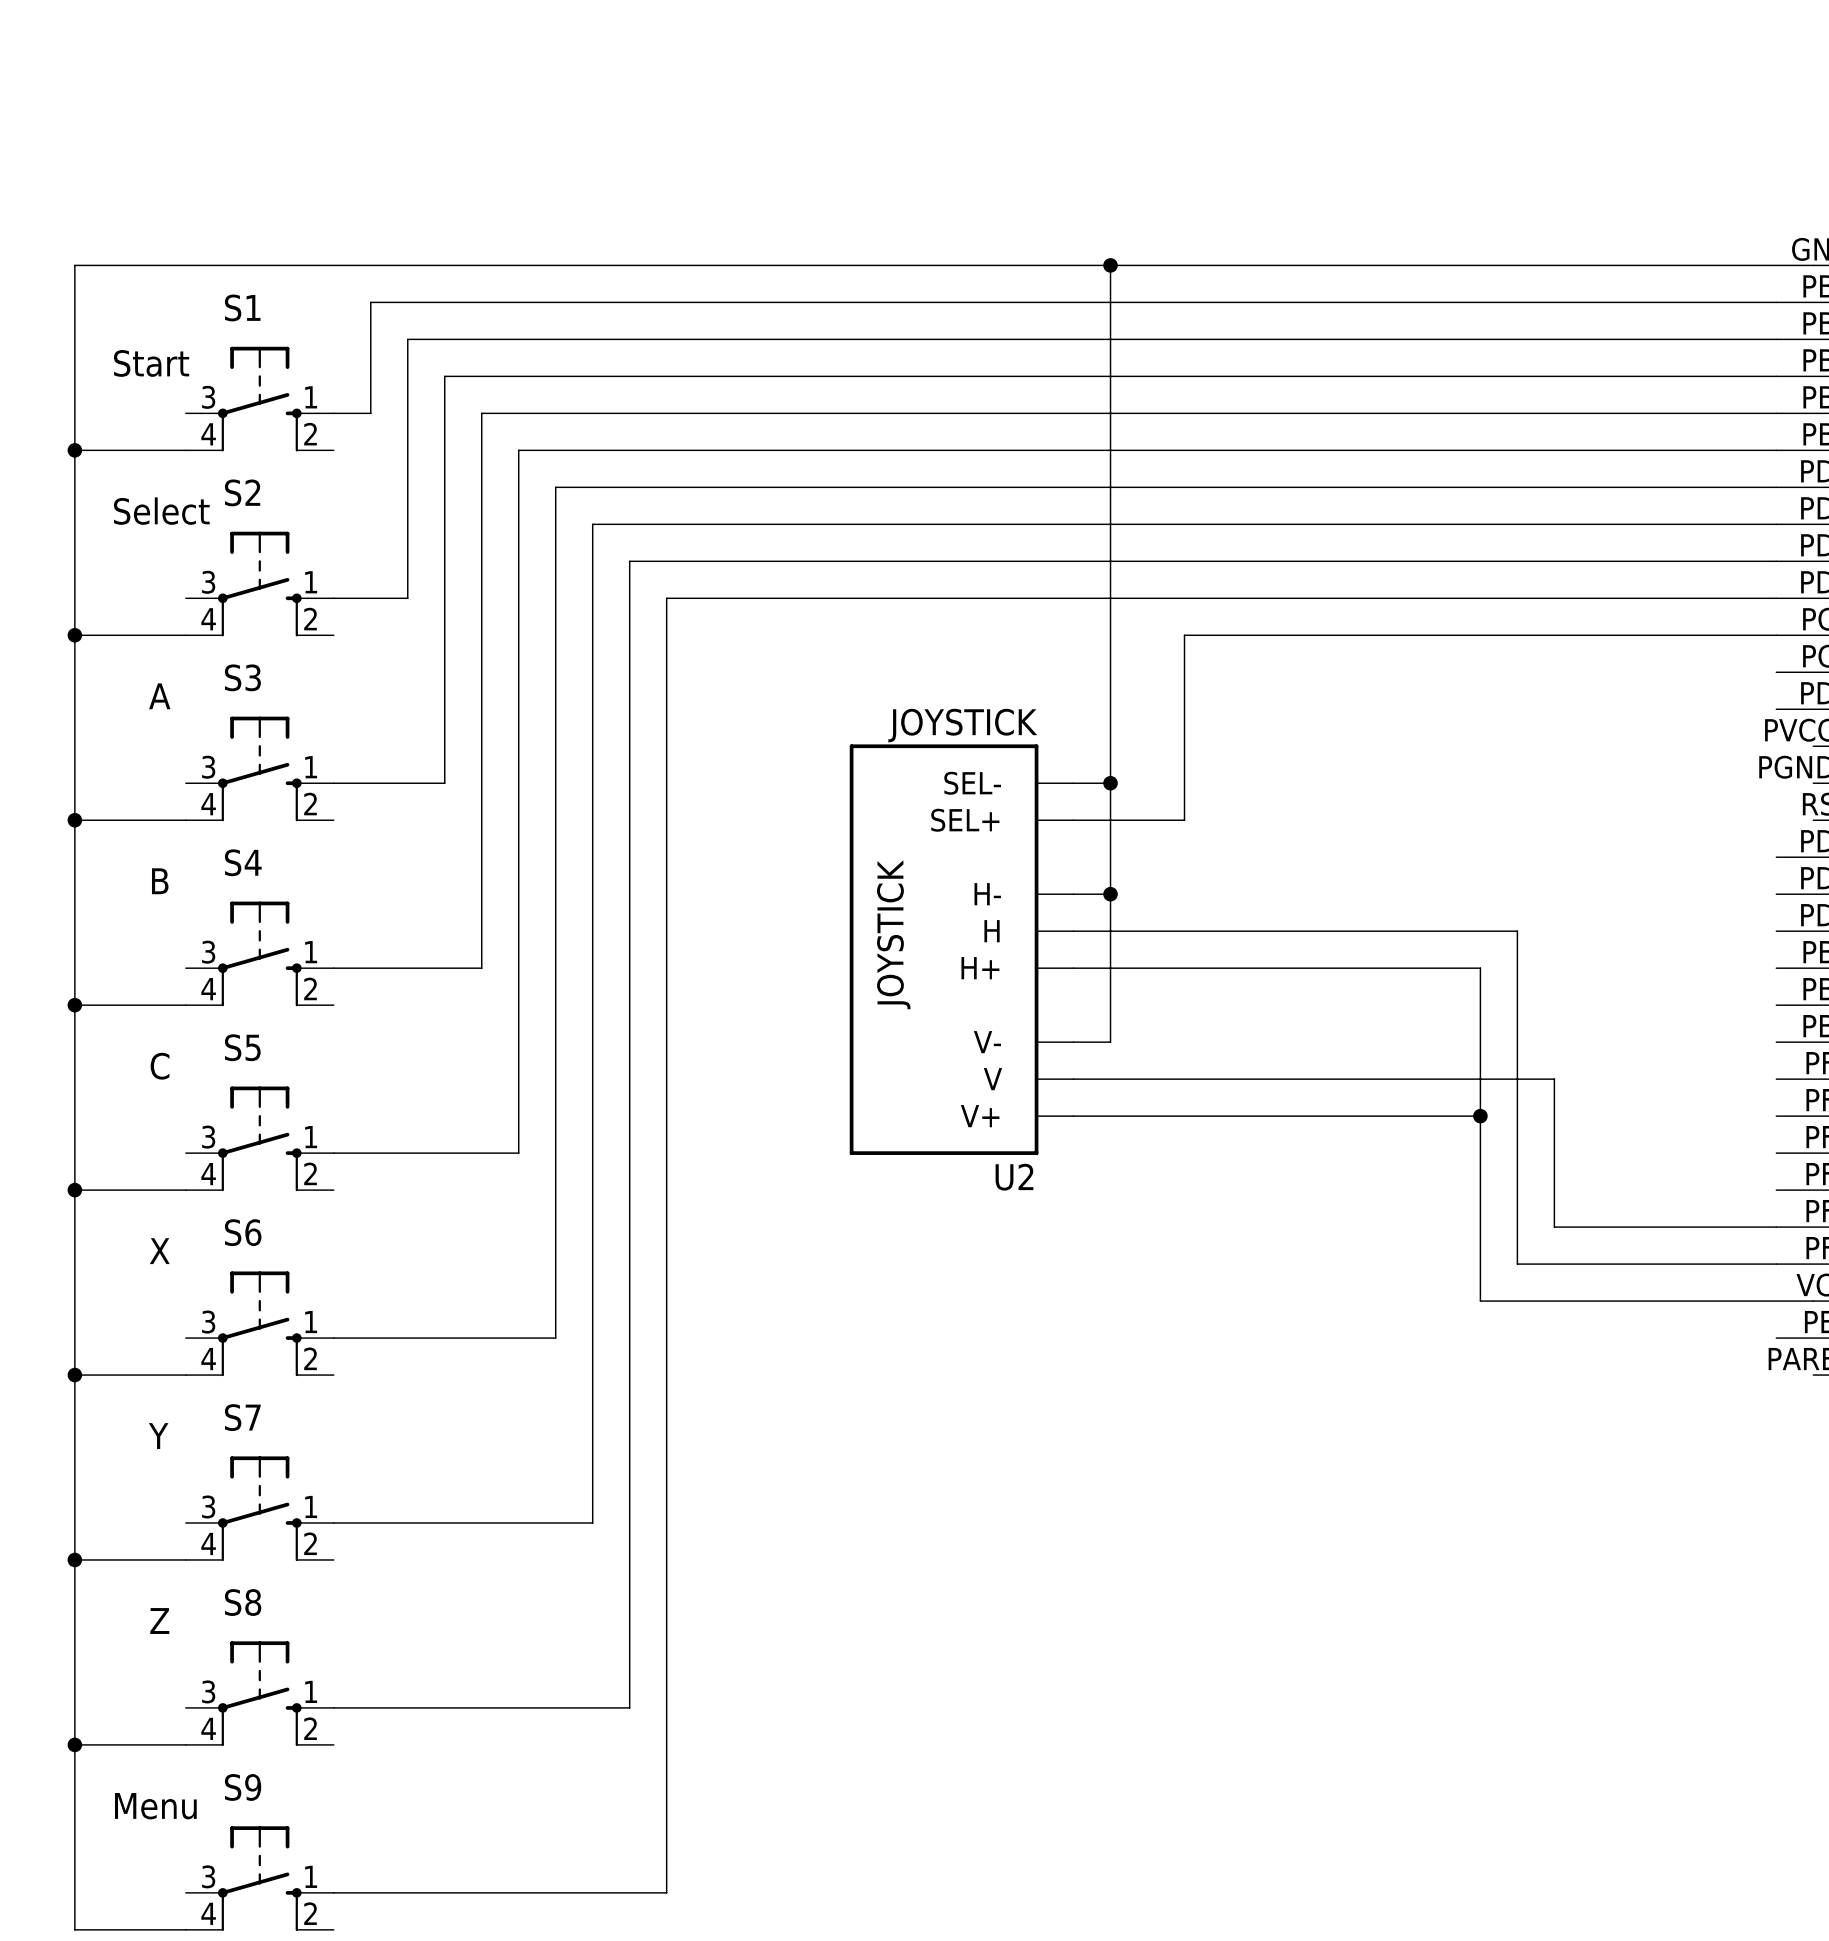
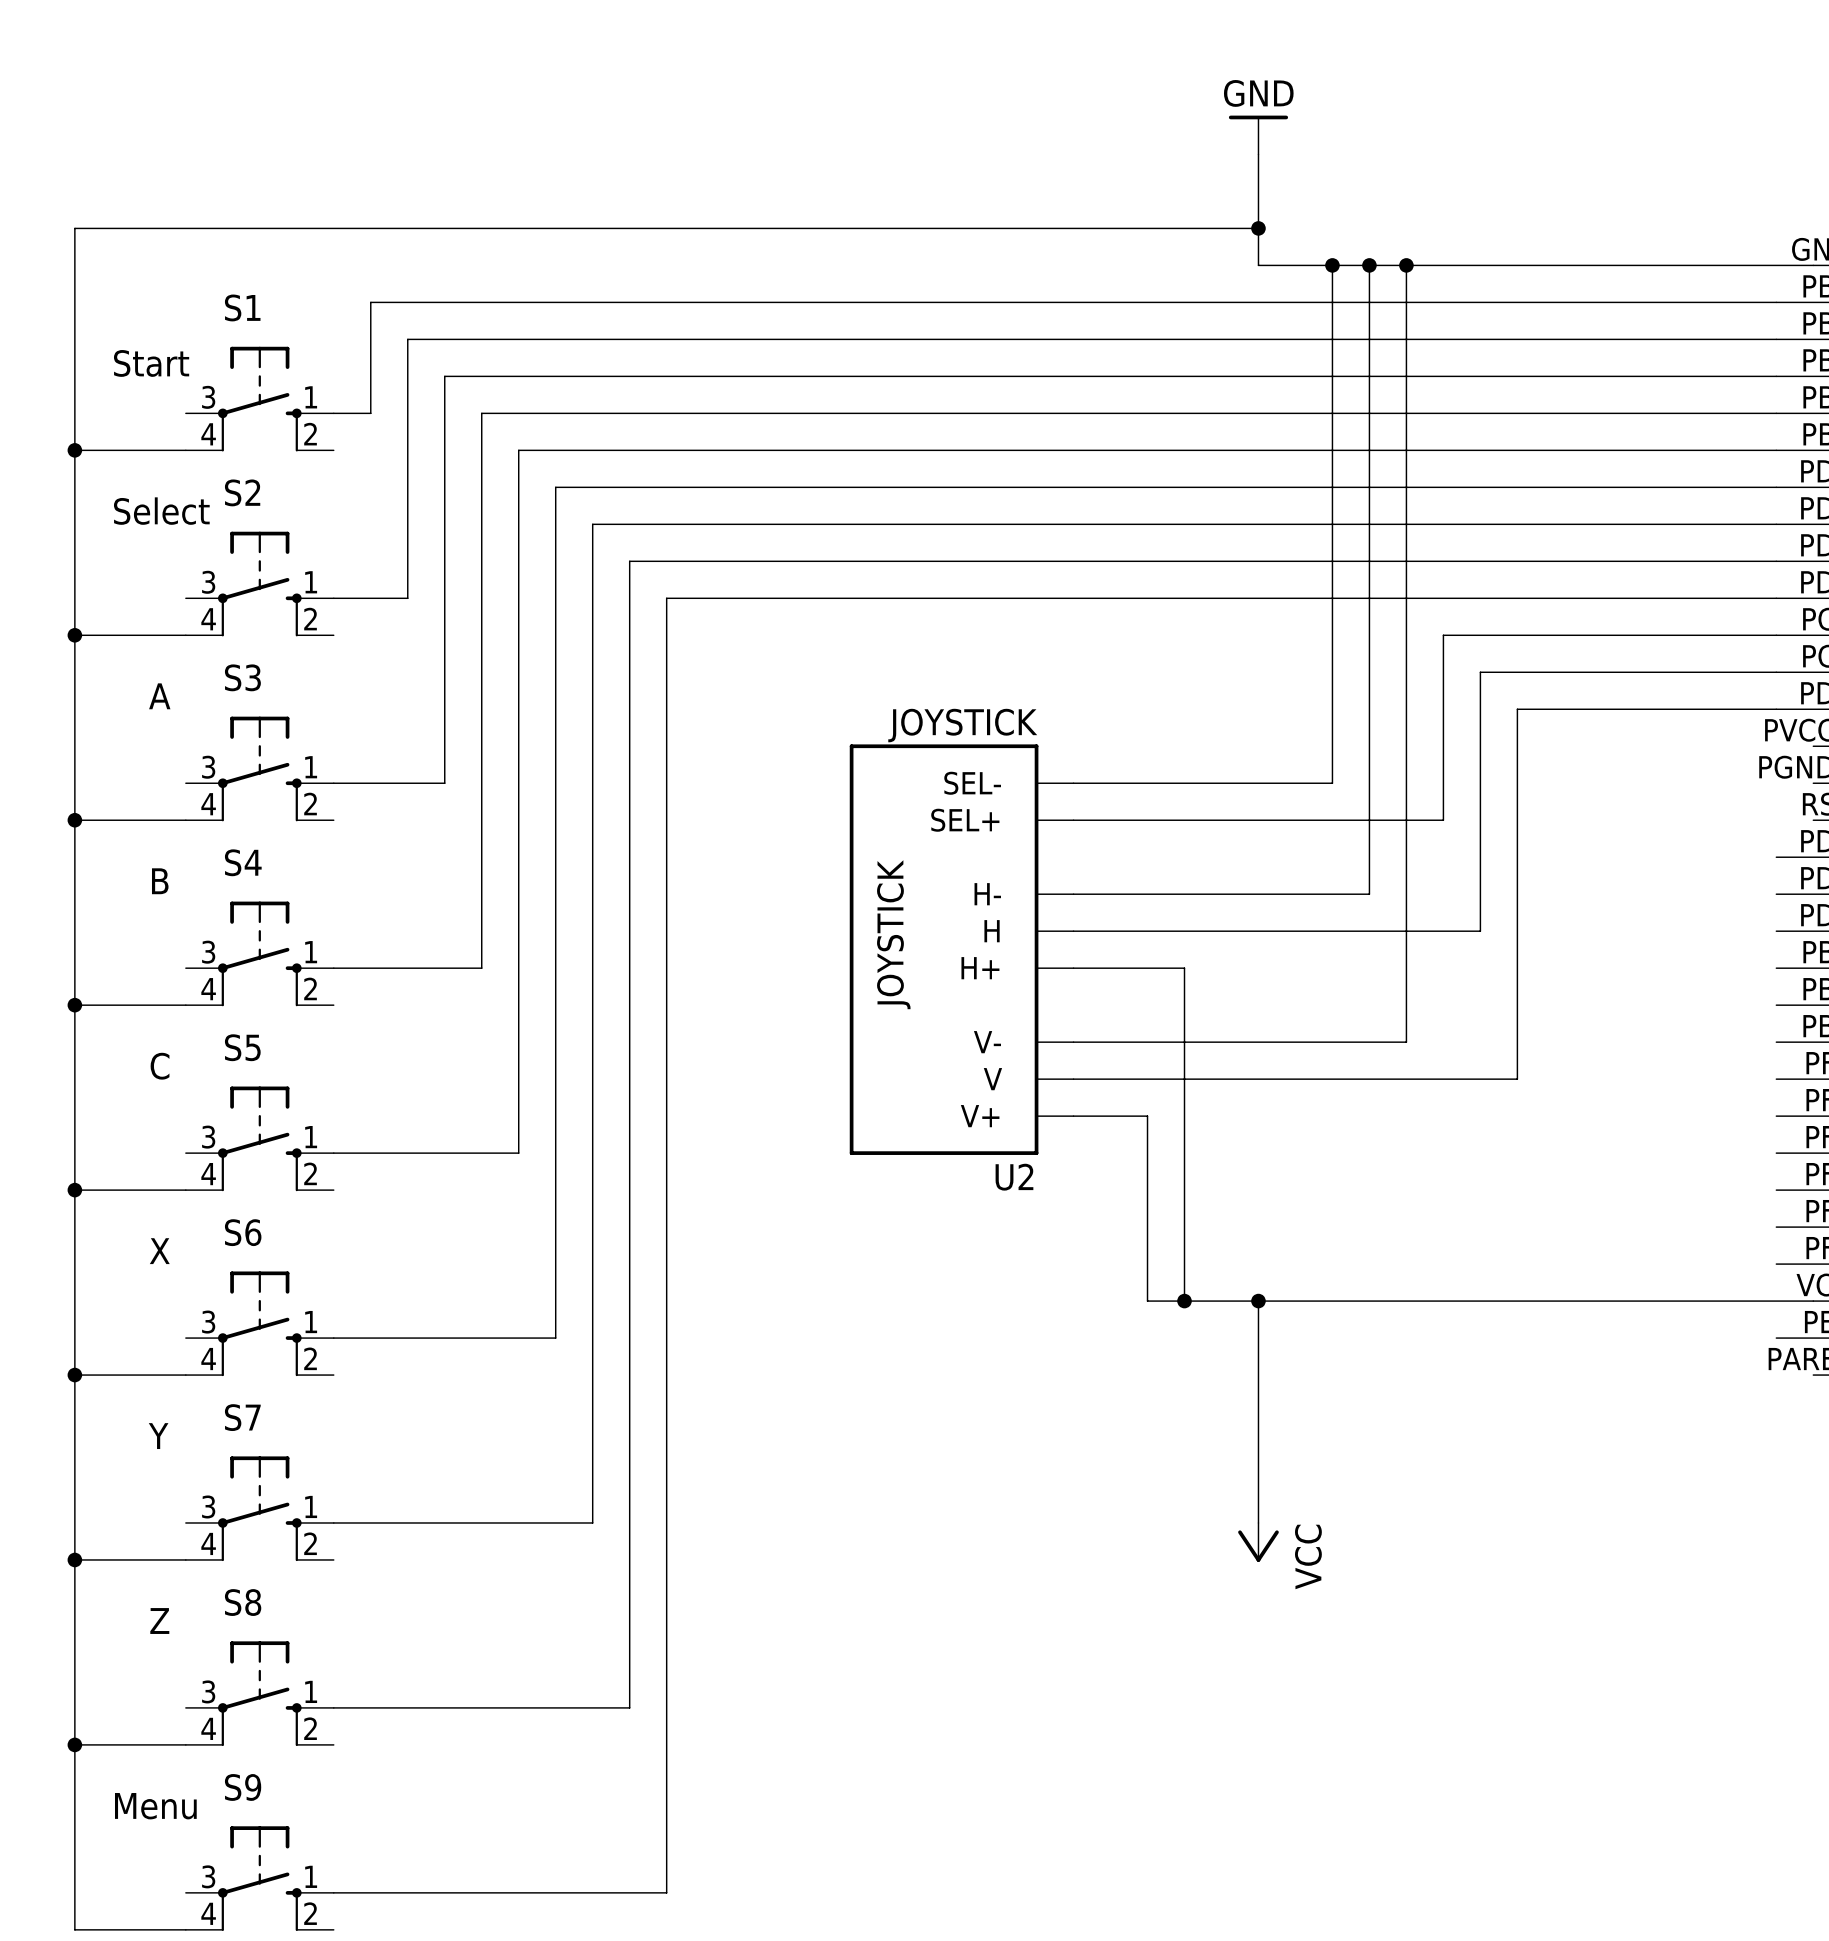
power symbol: none -> GND (1258, 135)
wire: none -> (1258, 154) (1258, 265)
junction: none -> (1258, 228)
wire: (74, 265) (1258, 265) -> (74, 265) (74, 228) (1258, 228)
wire: (1110, 265) (1110, 1042) -> (1406, 265) (1406, 1042) (1110, 1042)
junction: (1110, 265) -> none
wire: none -> (1332, 265) (1332, 783) (1110, 783)
junction: none -> (1332, 265)
wire: none -> (1369, 265) (1369, 894) (1110, 894)
junction: none -> (1369, 265)
junction: none -> (1406, 265)
wire: (1443, 635) (1184, 635) (1184, 820) -> (1443, 635) (1443, 820) (1184, 820)
wire: none -> (1776, 709) (1517, 709) (1517, 931)
junction: (1110, 783) -> none
junction: (1110, 894) -> none
wire: (1480, 931) (1517, 931) -> (1480, 931) (1480, 672) (1776, 672)
wire: (1184, 968) (1480, 968) (1480, 1301) -> (1147, 1116) (1147, 1301) (1480, 1301)
wire: none -> (1184, 968) (1184, 1301)
wire: (1147, 1116) (1480, 1116) -> none
junction: (1480, 1116) -> none
wire: (1776, 1227) (1554, 1227) (1554, 1079) (1517, 1079) (1517, 1264) (1776, 1264) -> none
junction: none -> (1184, 1301)
wire: none -> (1258, 1301) (1258, 1522)
junction: none -> (1258, 1301)
power symbol: none -> VCC (1258, 1542)

